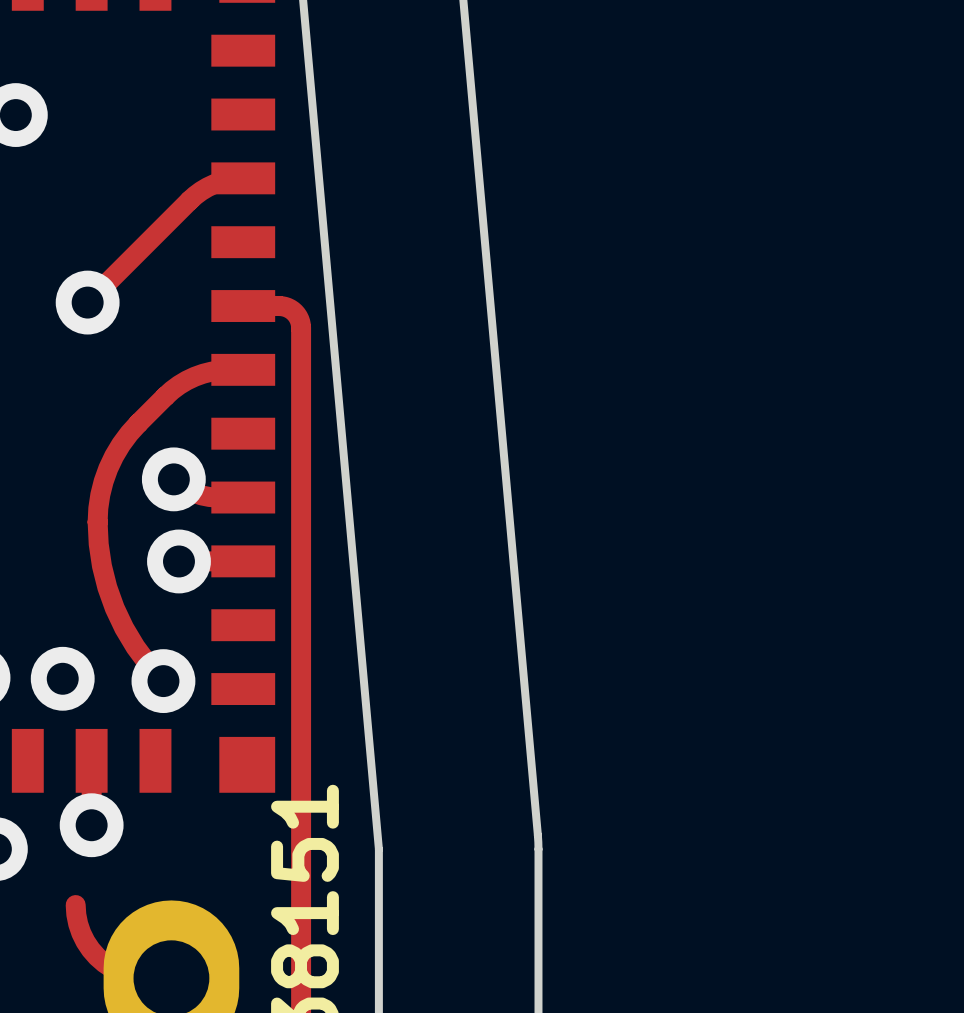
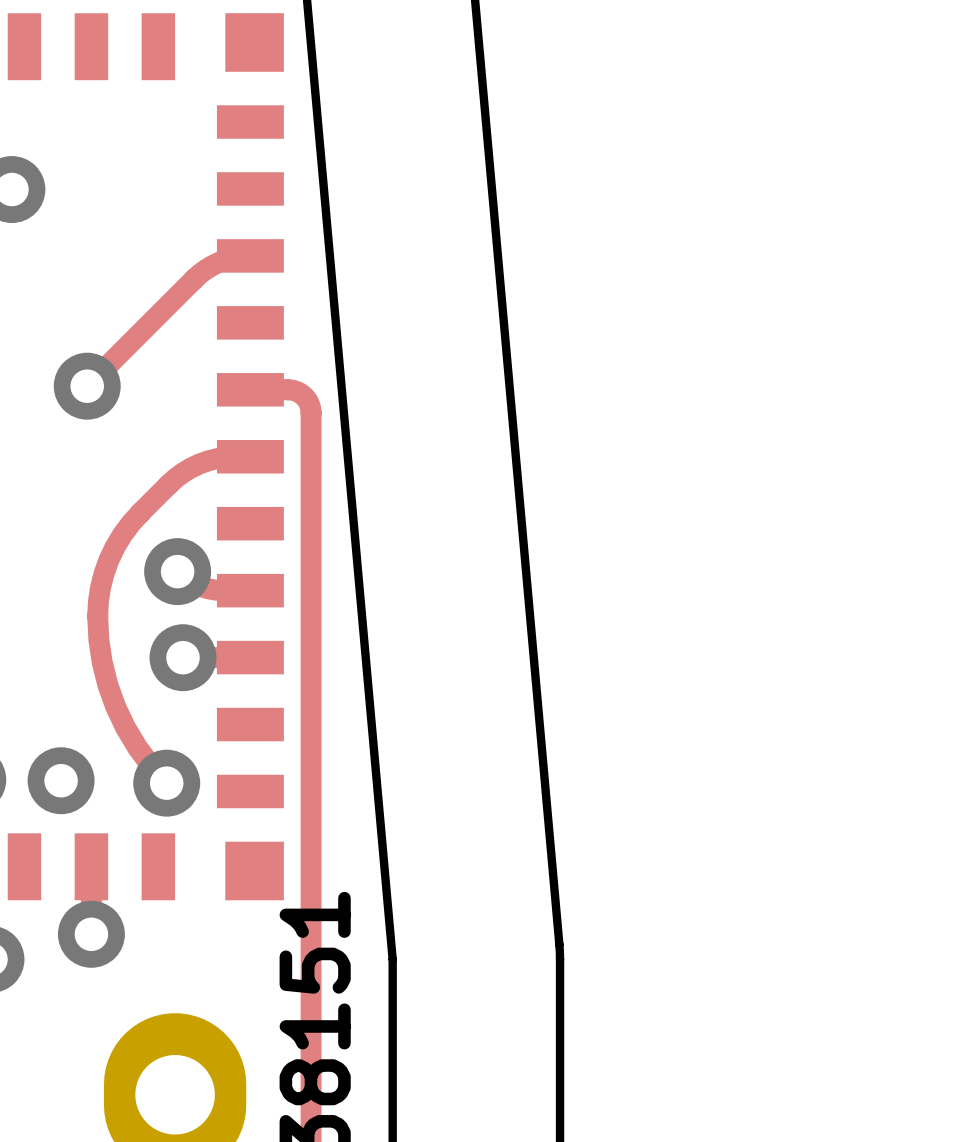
track: (75, 905) (81, 933) (97, 956) (120, 972) (148, 978) -> none

